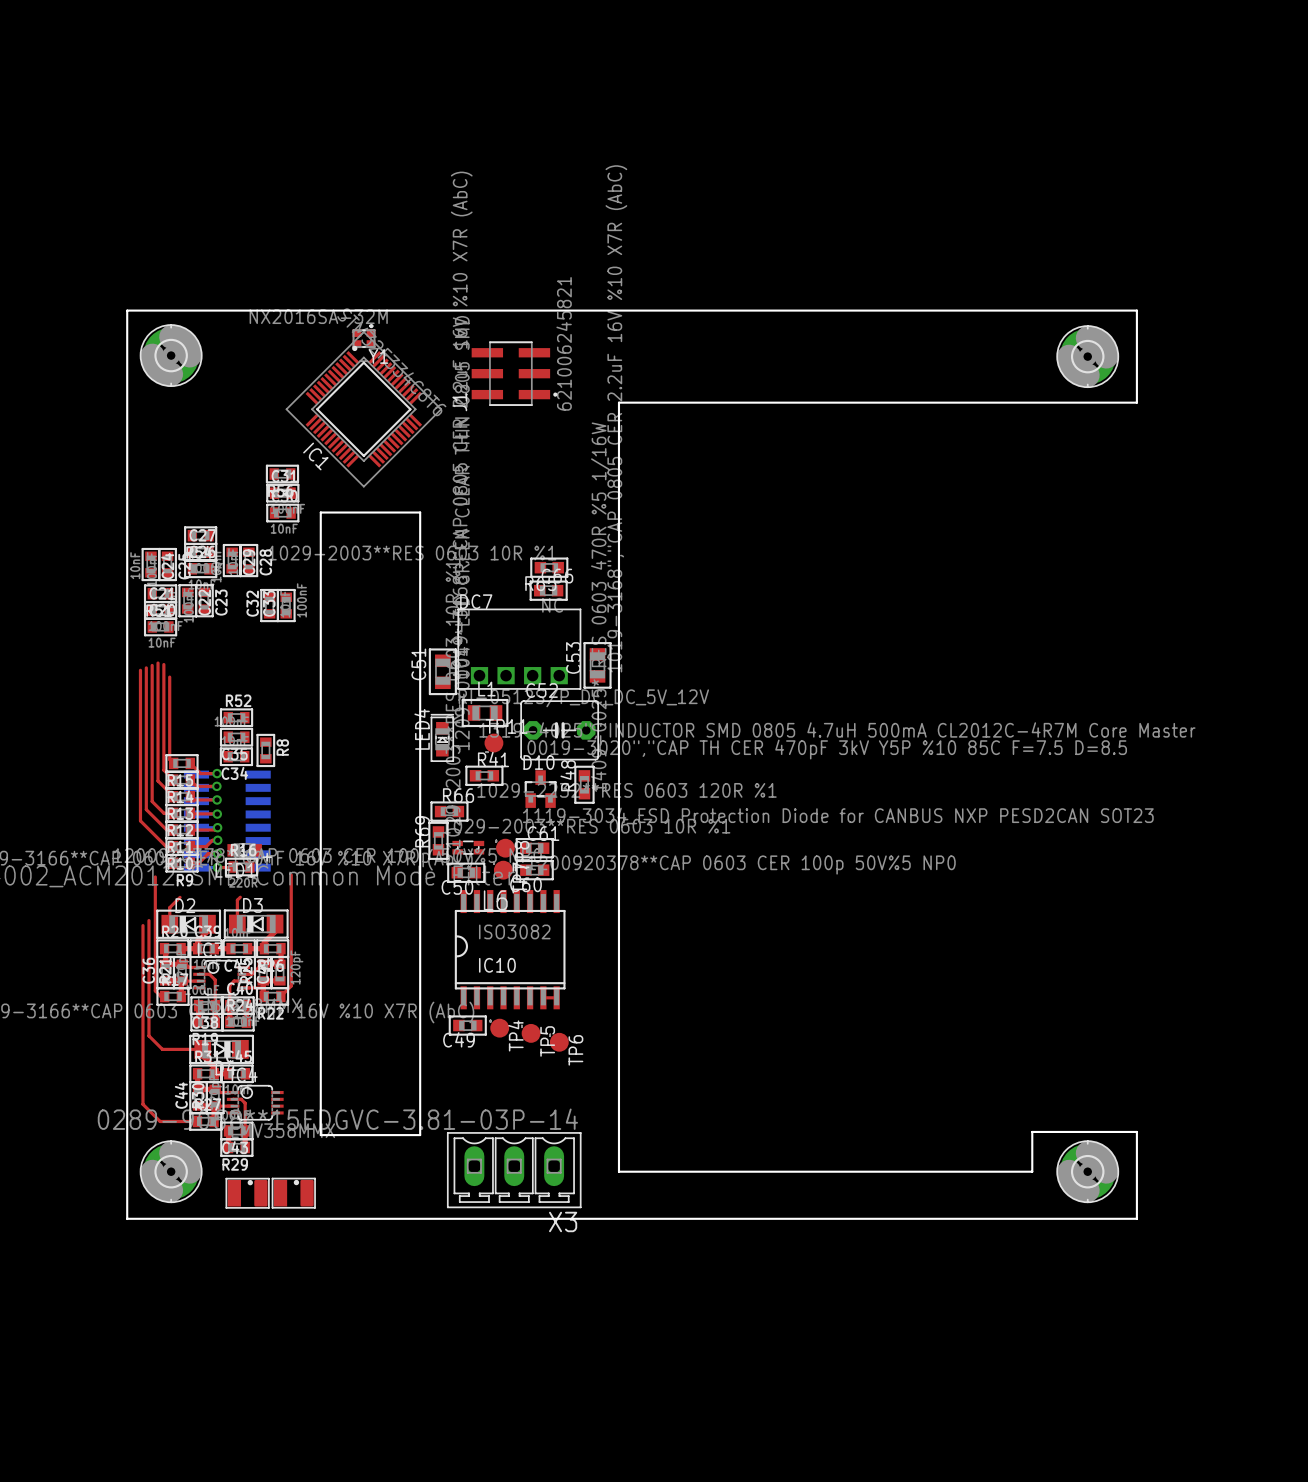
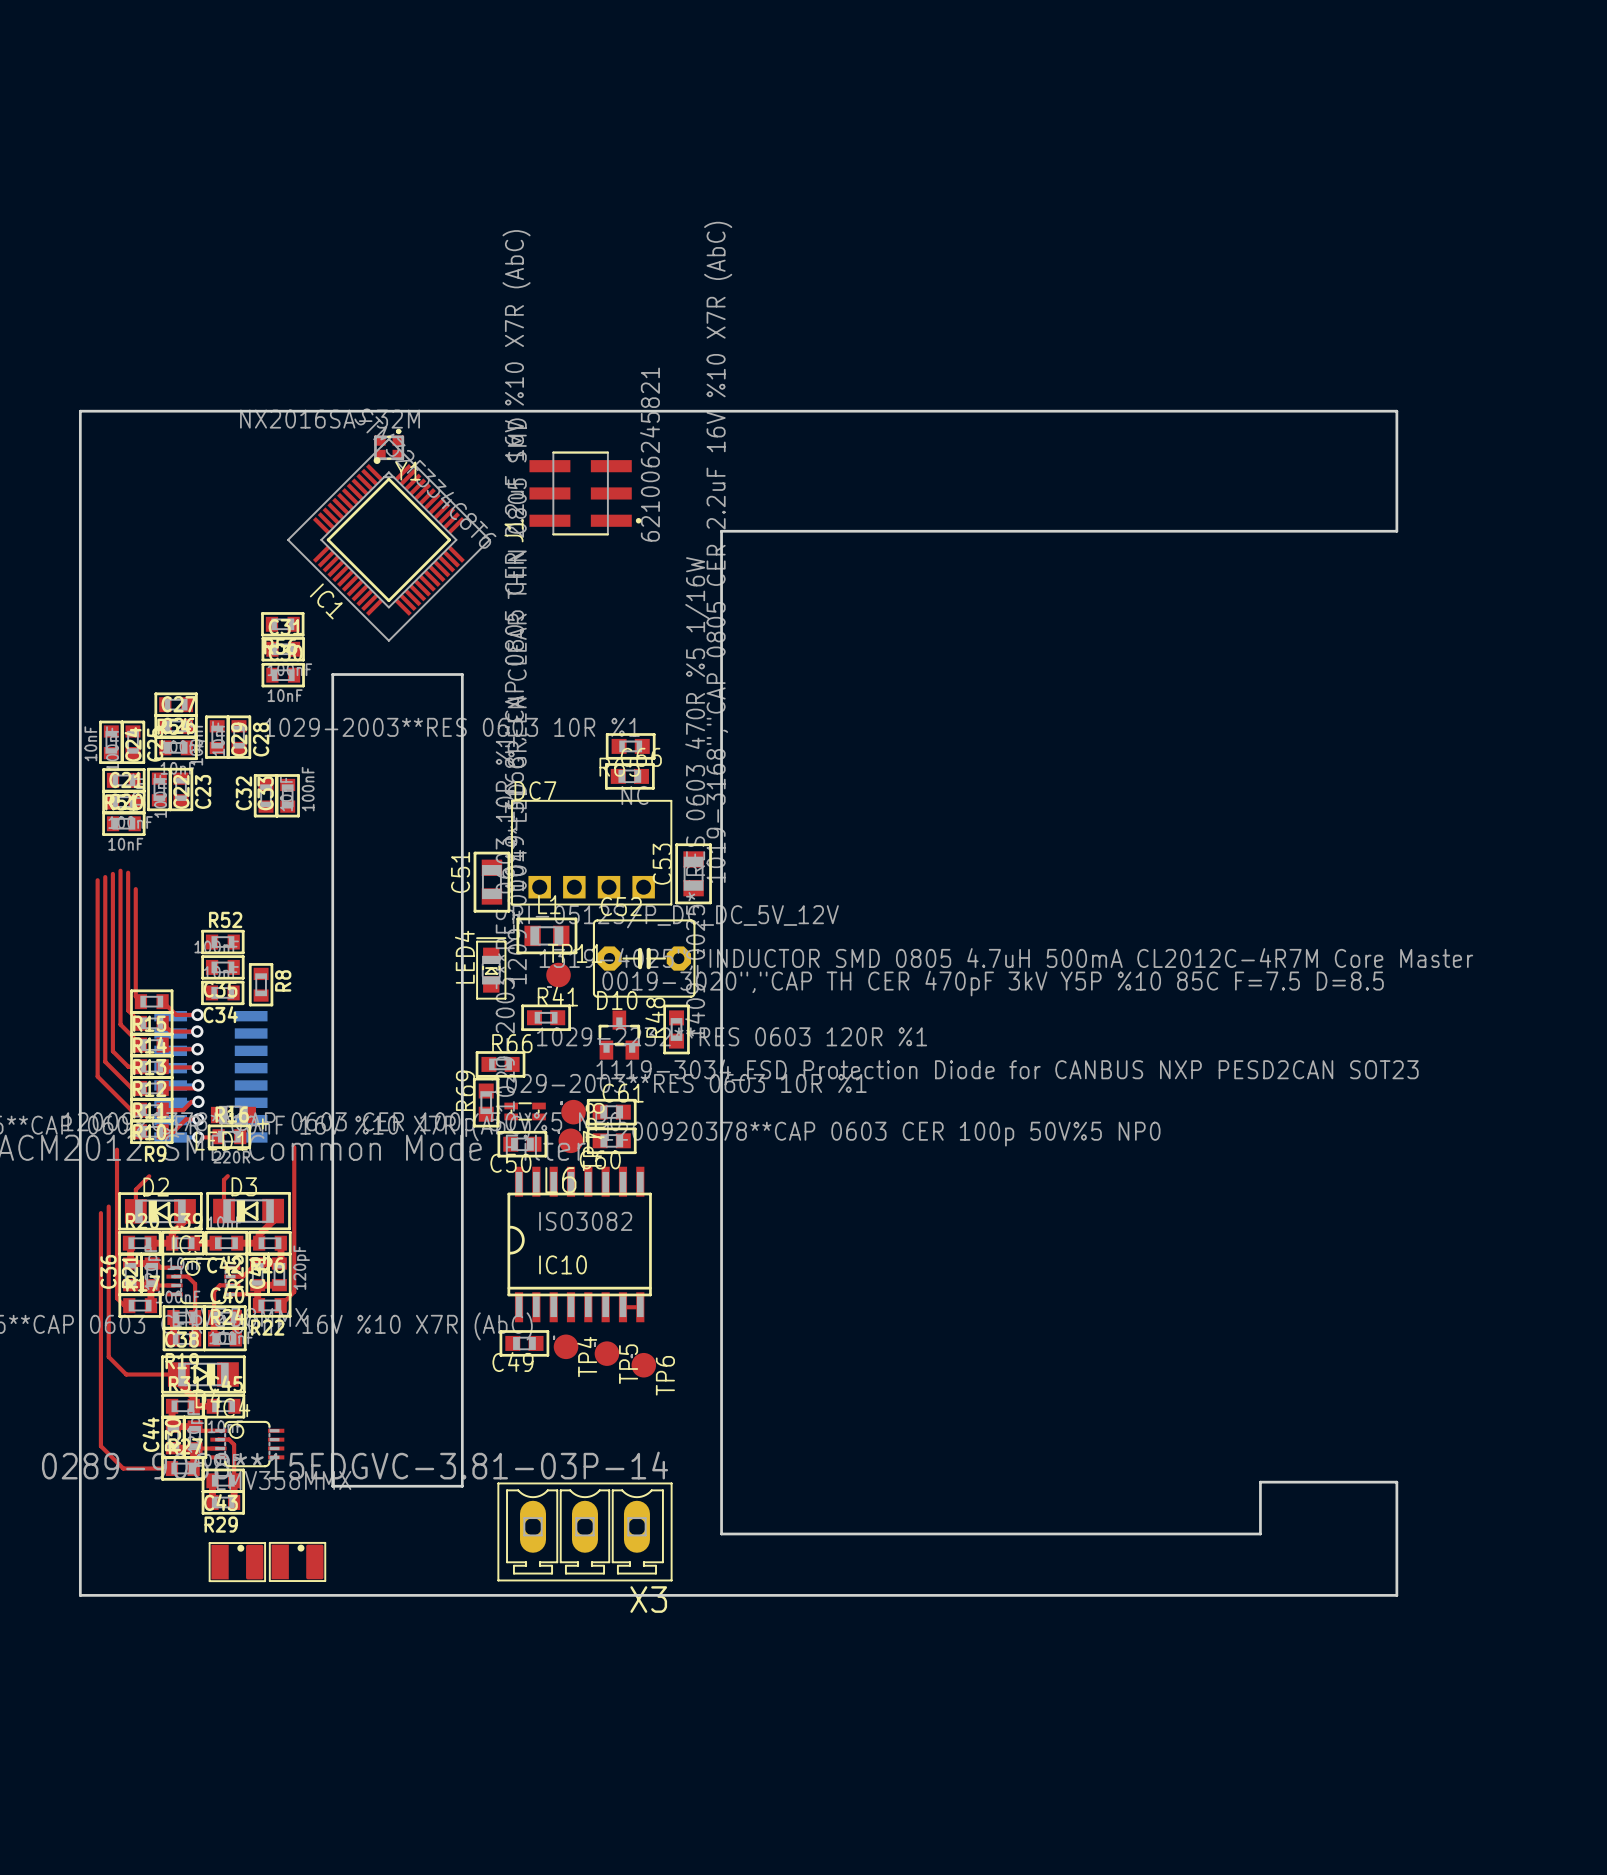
part: (171, 355) -> none
part: (1087, 356) -> none
part: (171, 1171) -> none
part: (1087, 1171) -> none

